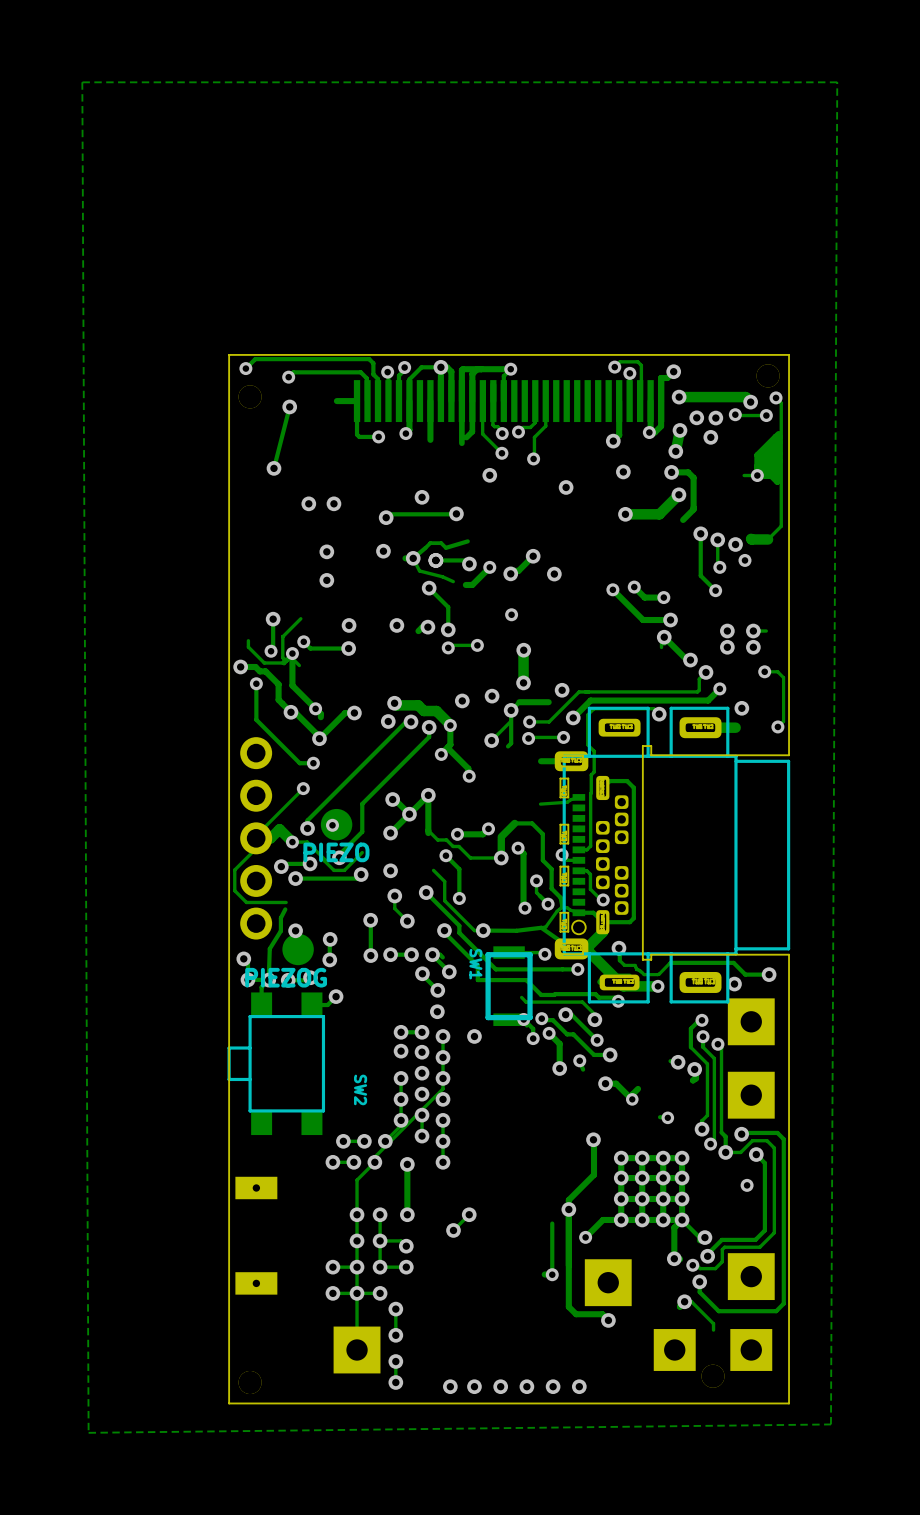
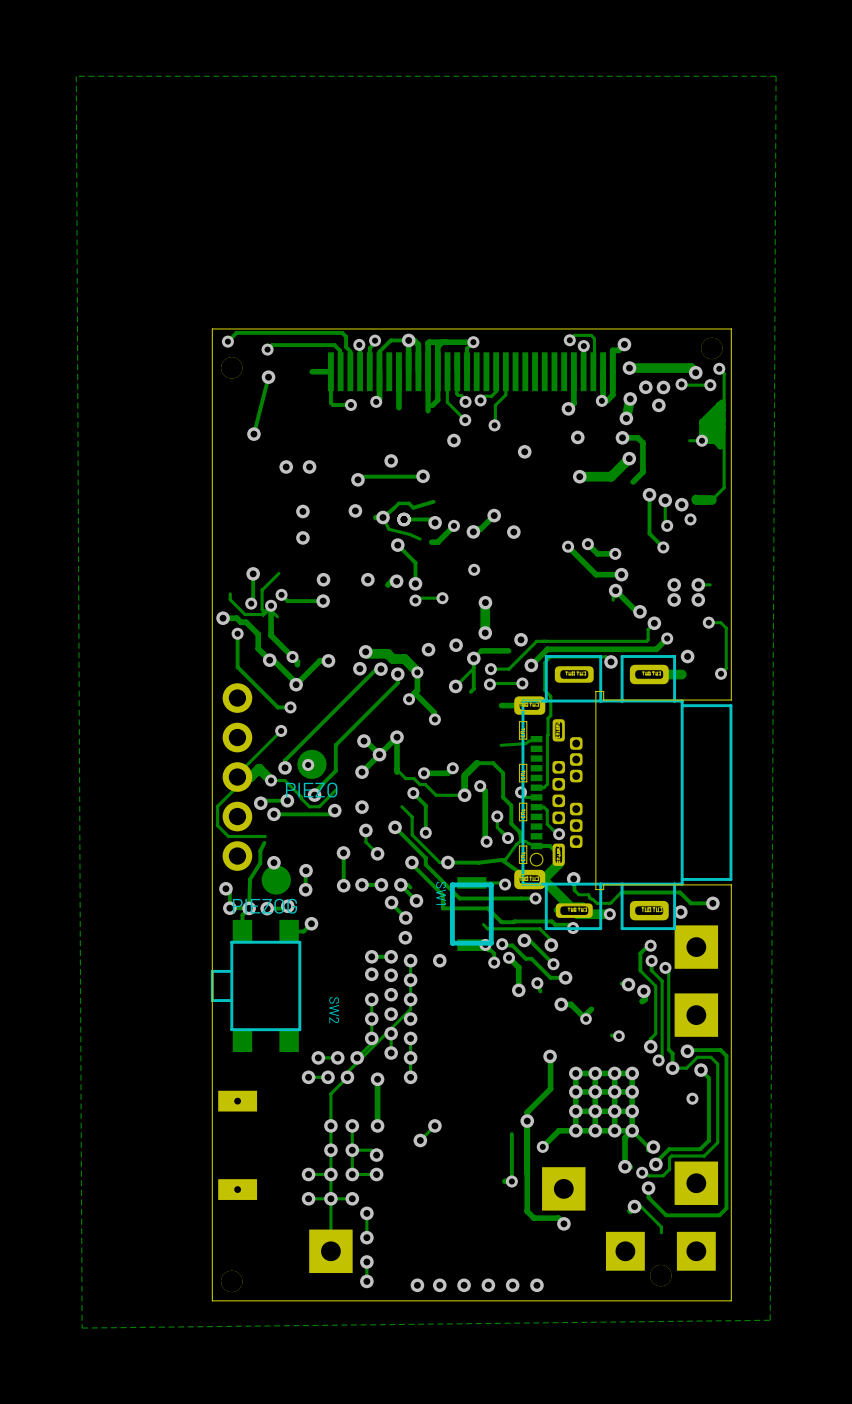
track: (602, 787) (609, 781) (627, 781) (633, 787) (633, 918) (629, 922) (602, 922) -> none

